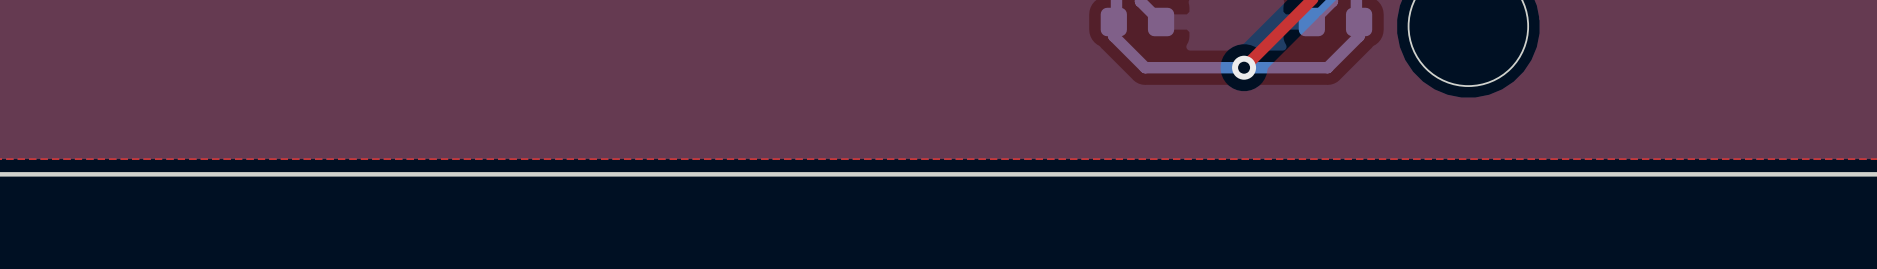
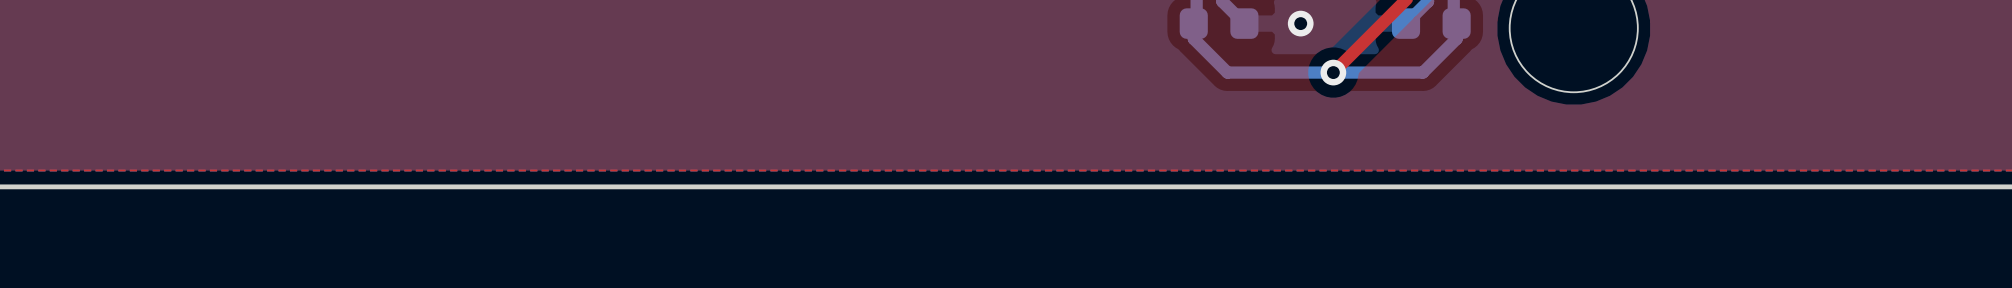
via: none -> (1300, 23)

